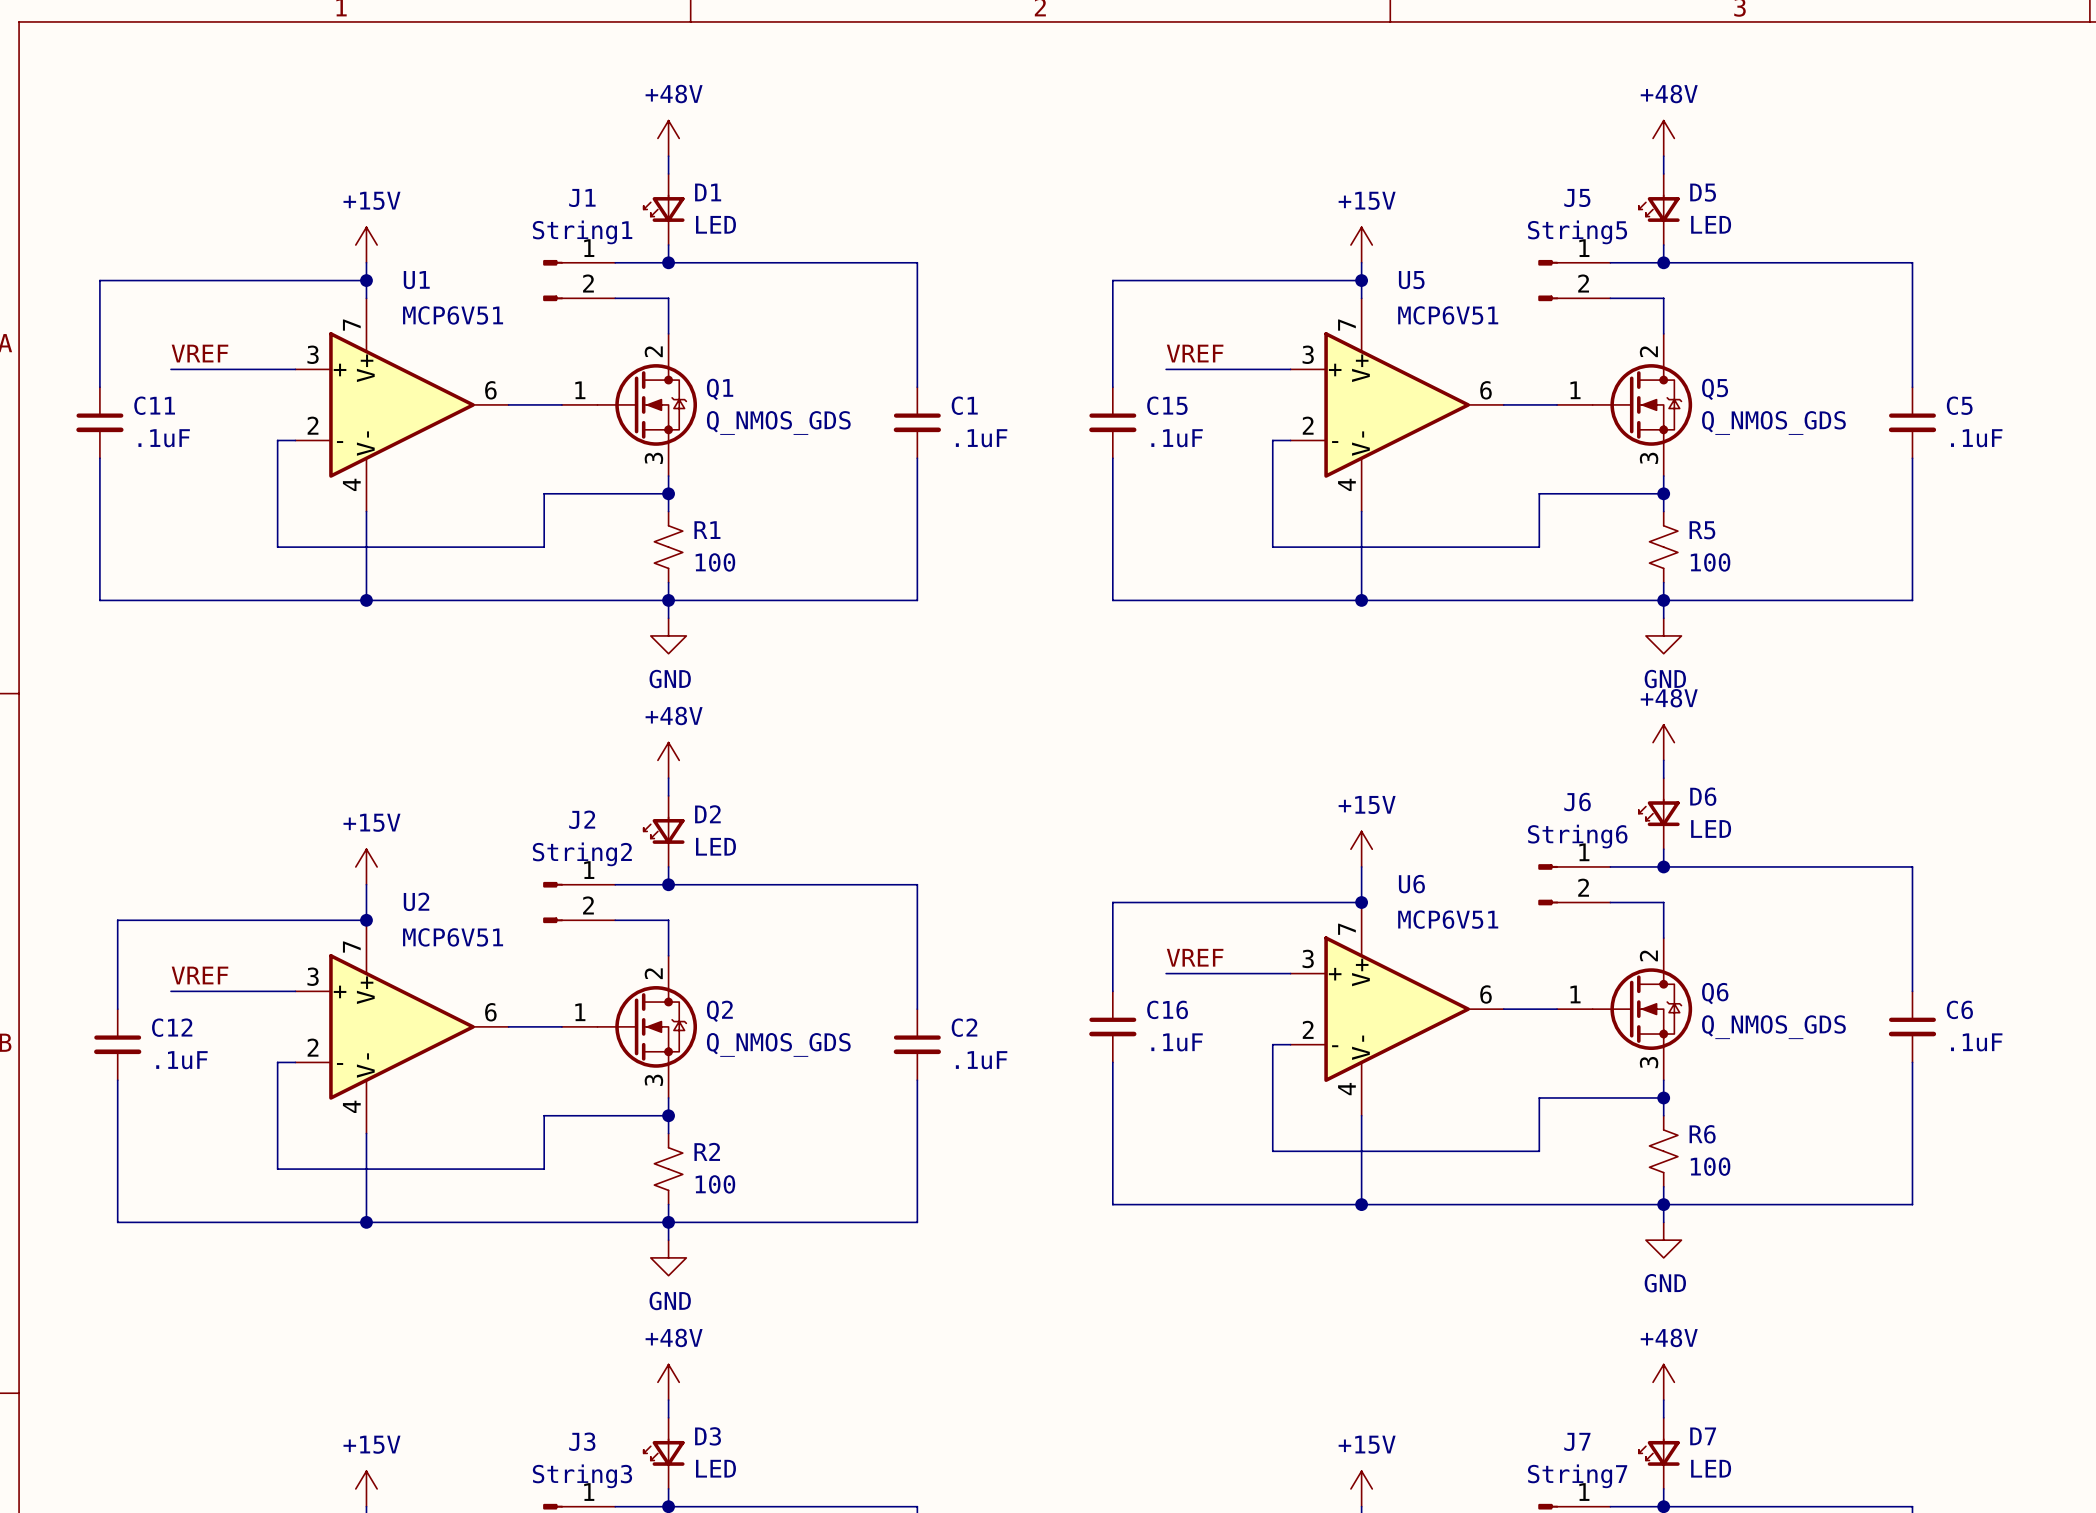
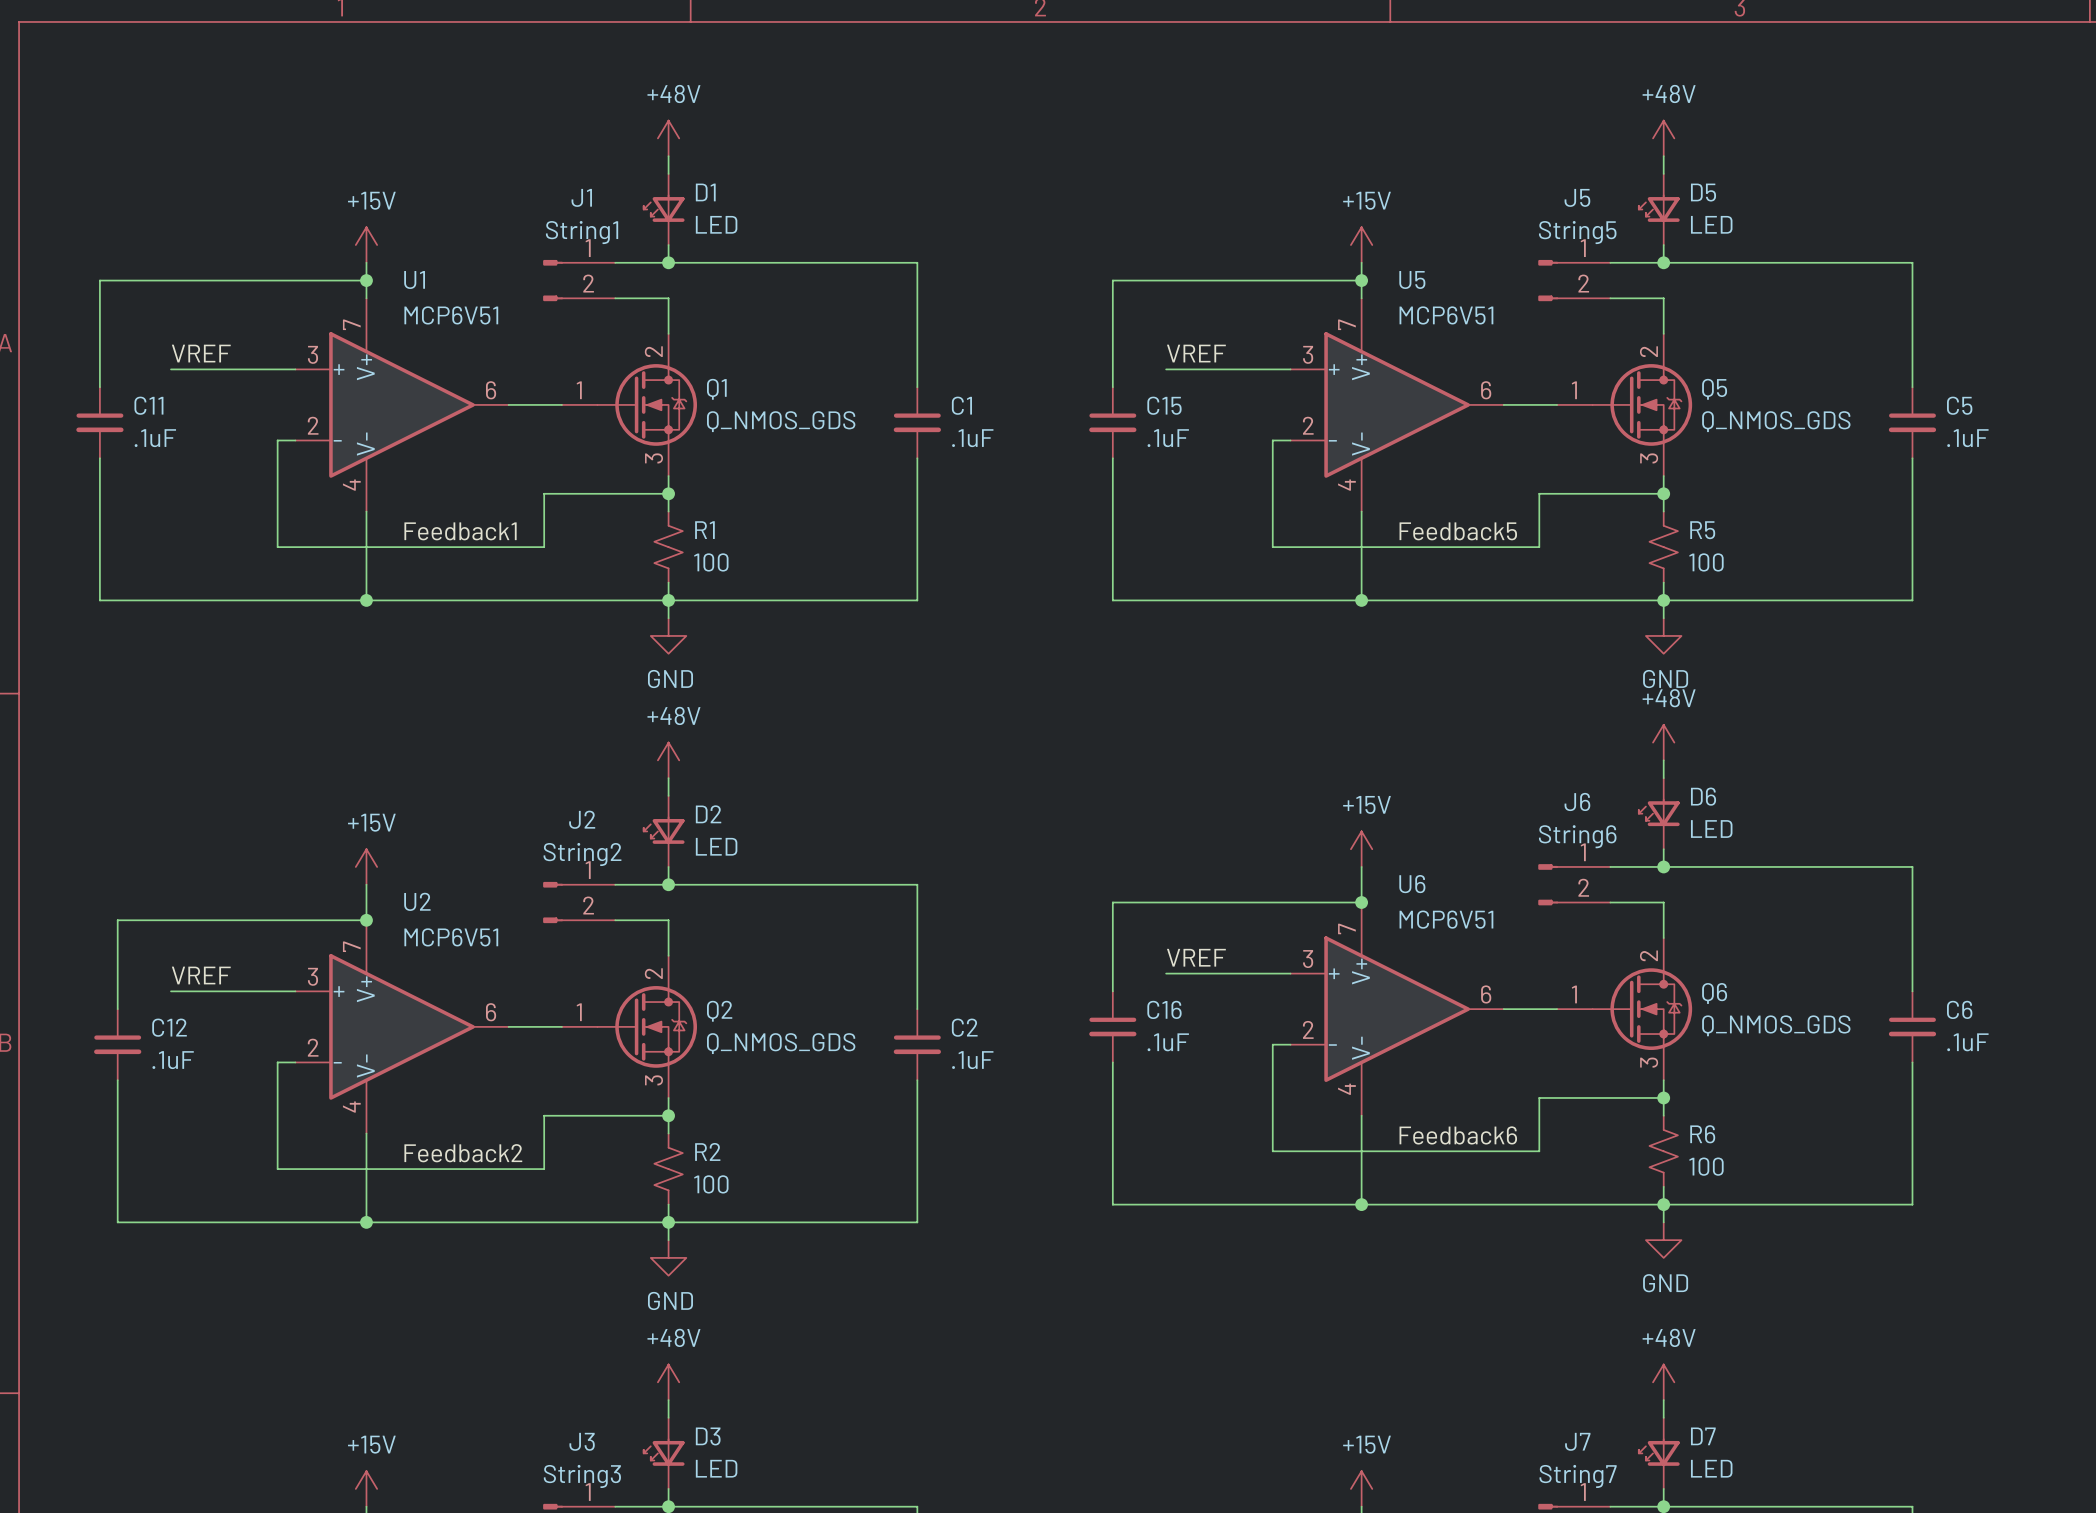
label: none -> Feedback1 (460, 531)
label: none -> Feedback5 (1458, 531)
label: none -> Feedback6 (1458, 1135)
label: none -> Feedback2 (463, 1153)

